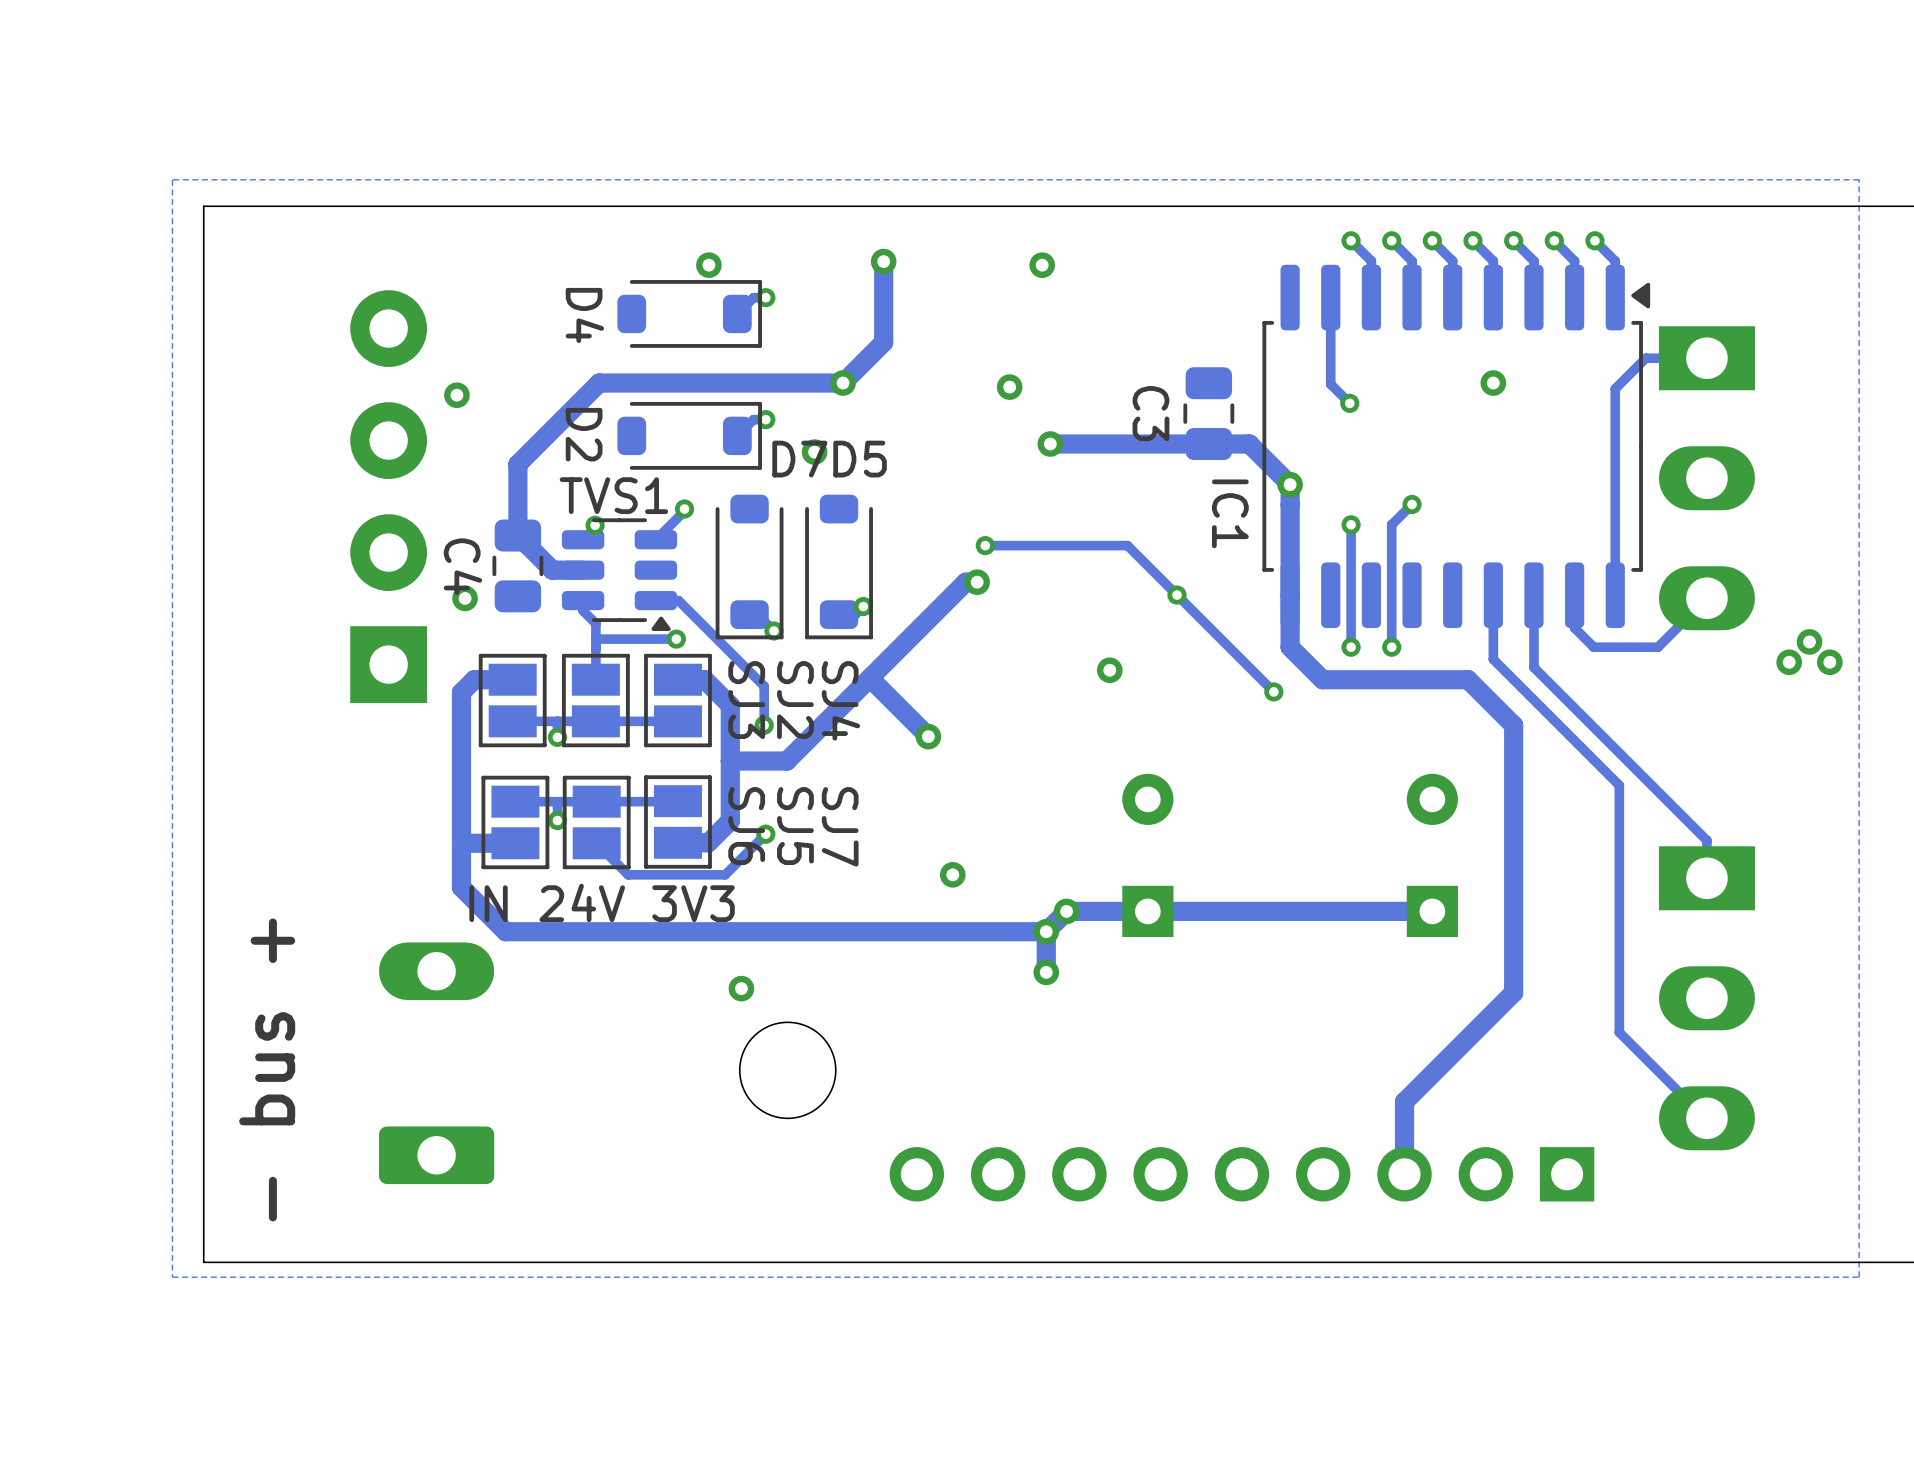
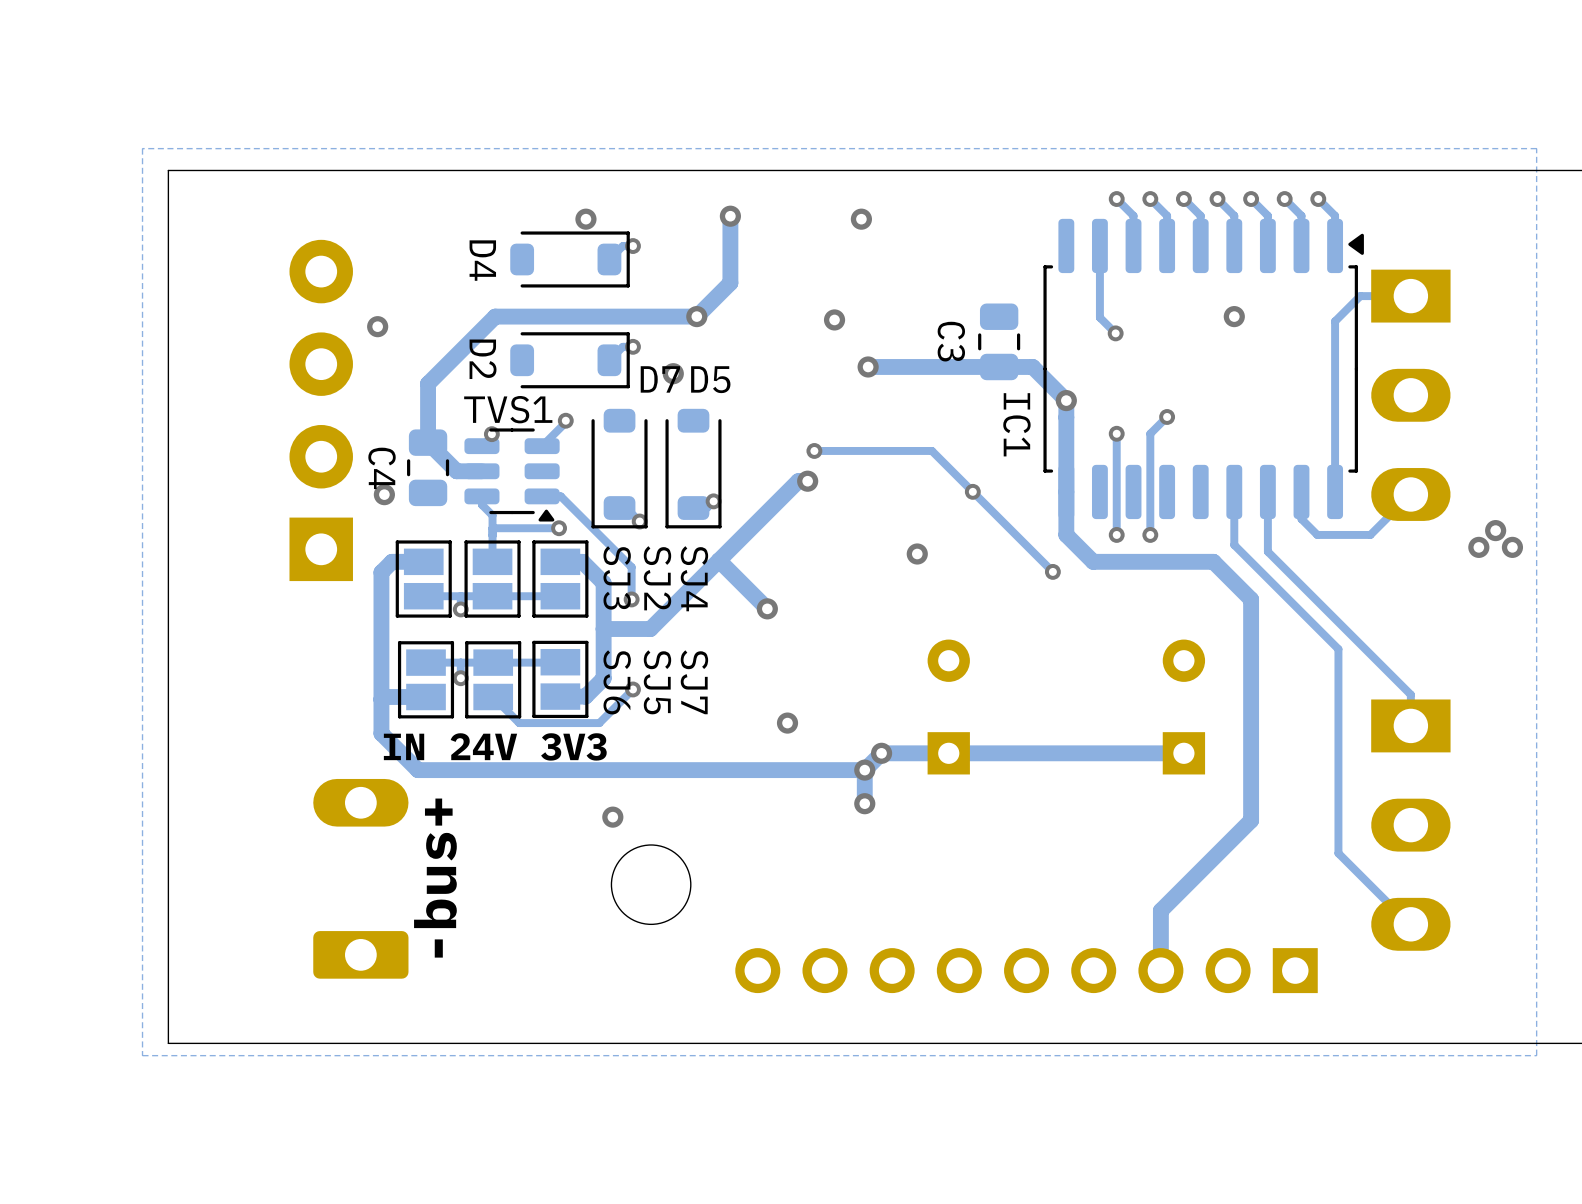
text: none -> -bus+ (435, 878)
text: - bus + (267, 1069) -> none

